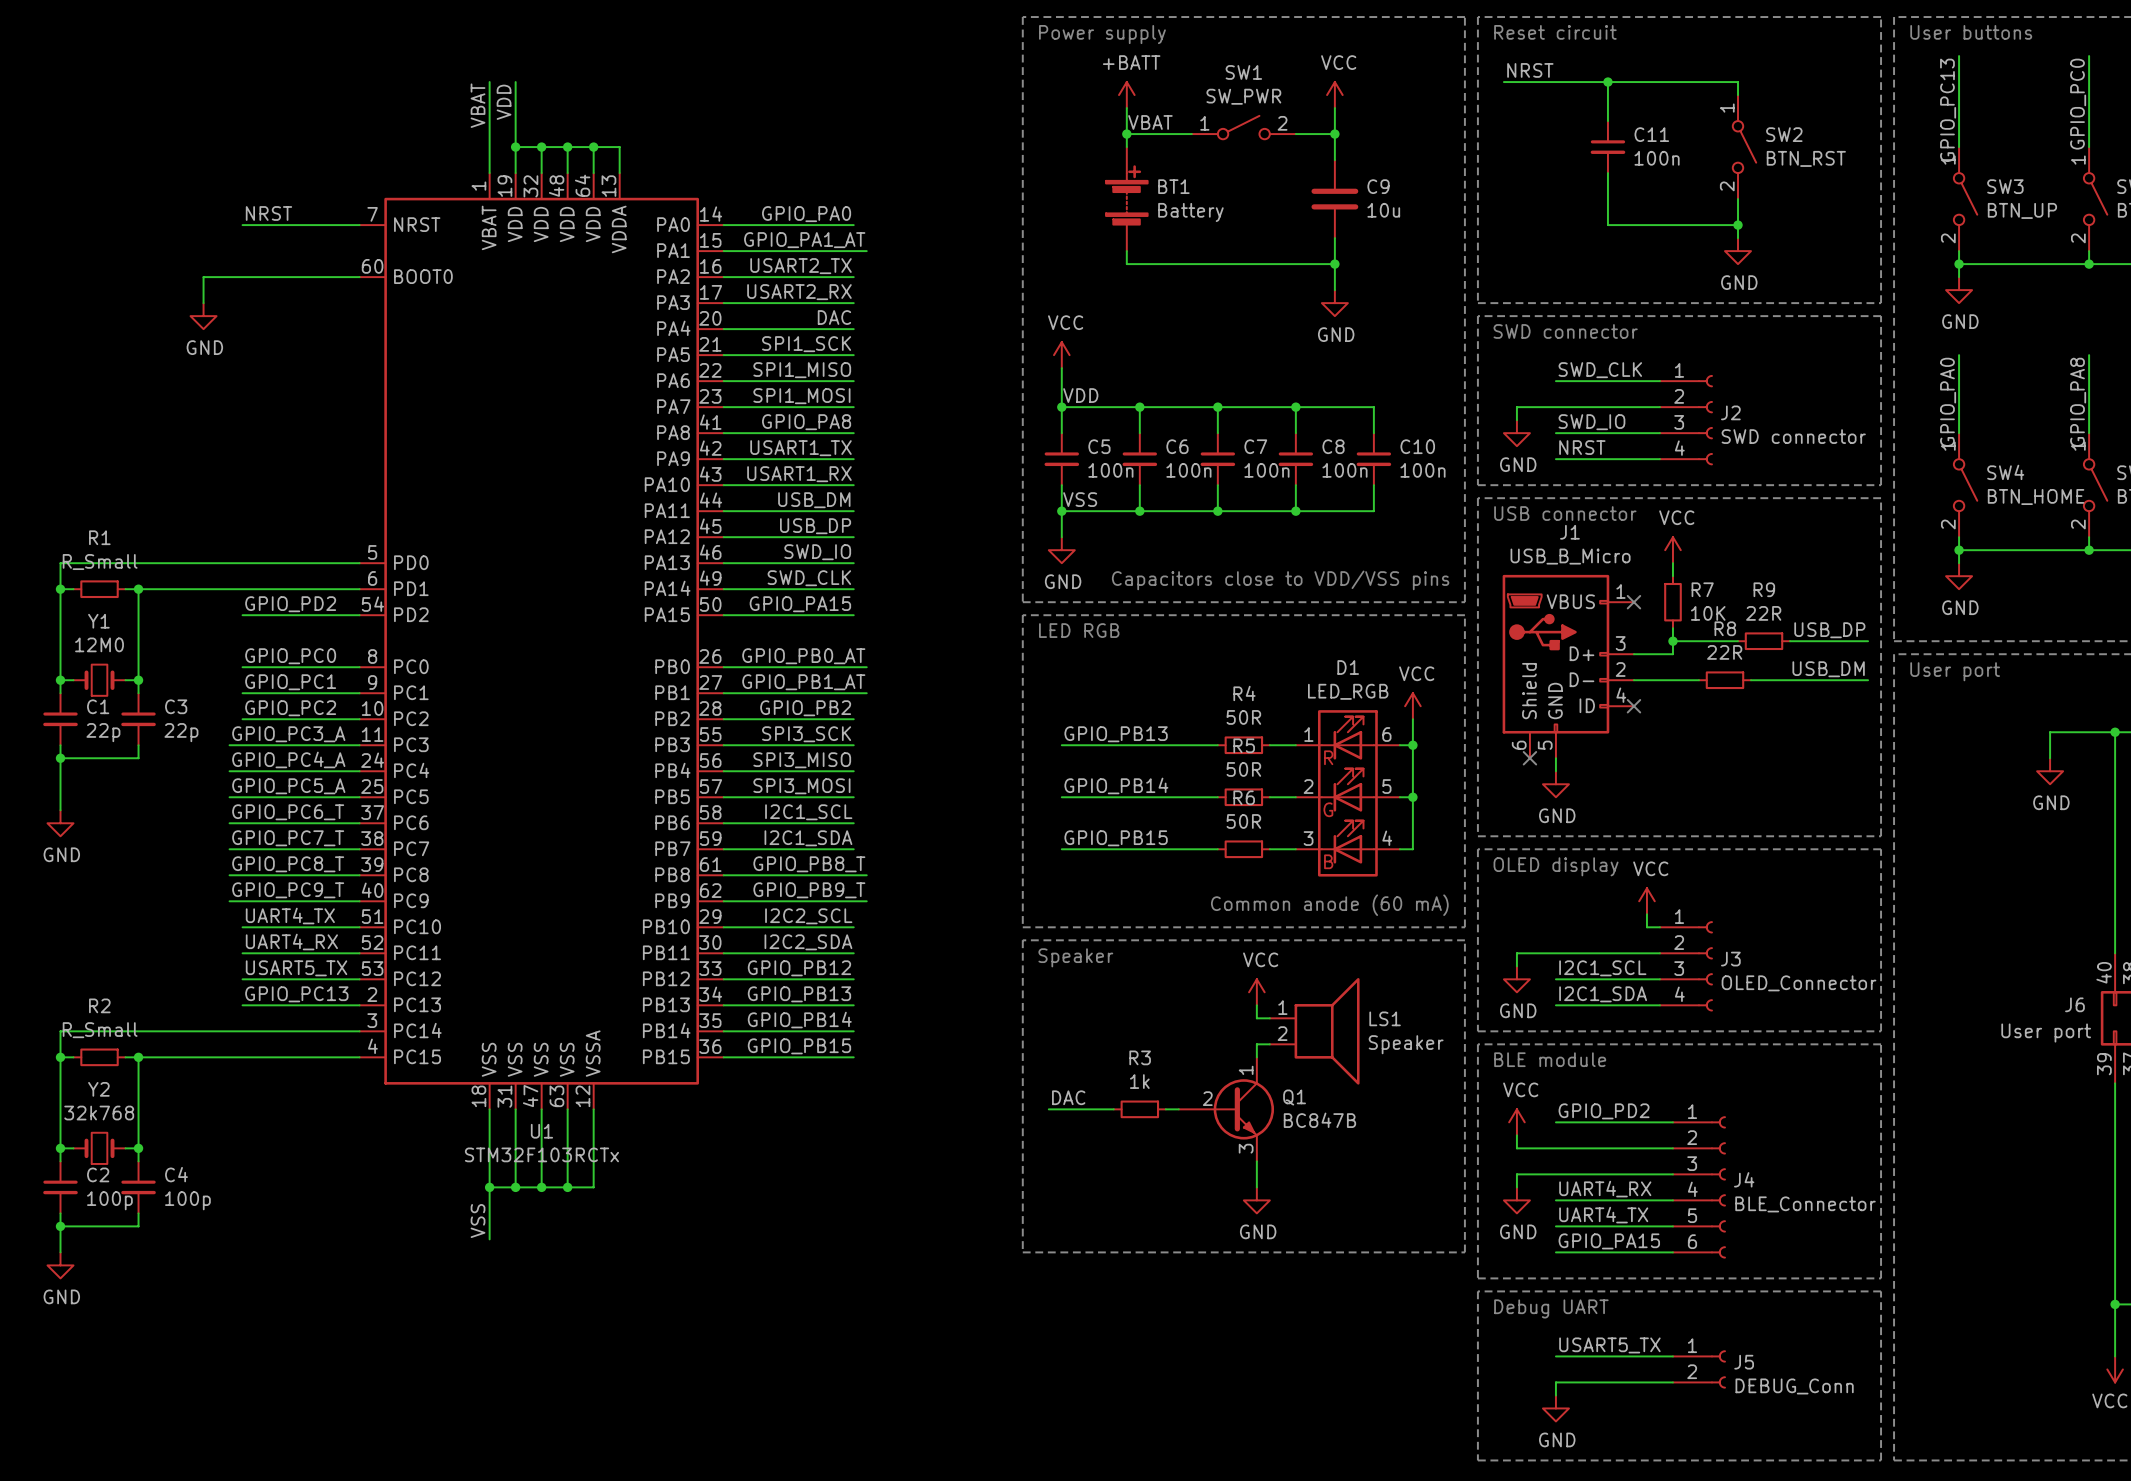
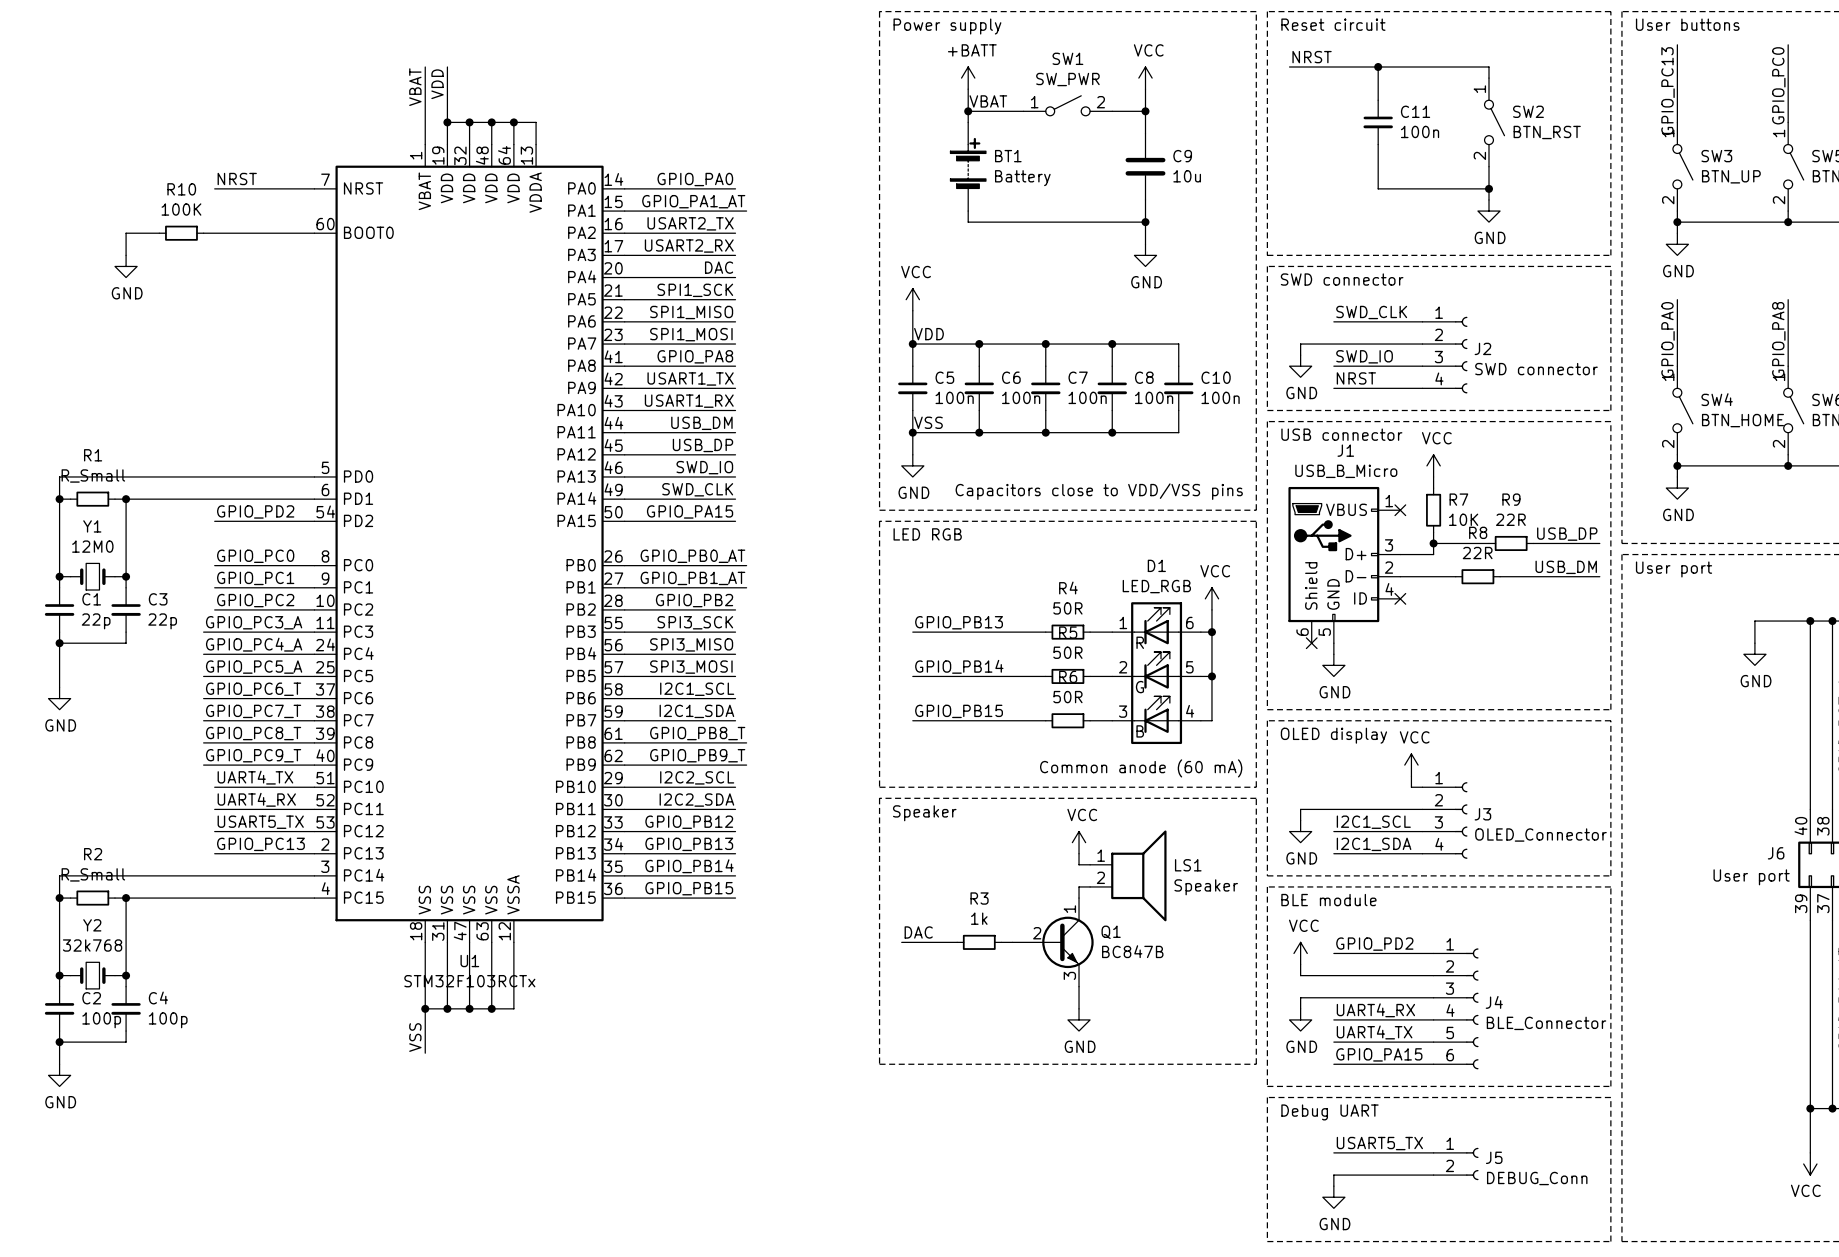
wire: none -> (159, 233) (126, 233) (126, 255)
R10: none -> 100K (181, 233)
wire: (229, 277) (203, 277) (203, 303) -> none
power symbol position: GND (203, 316) -> GND (126, 266)

